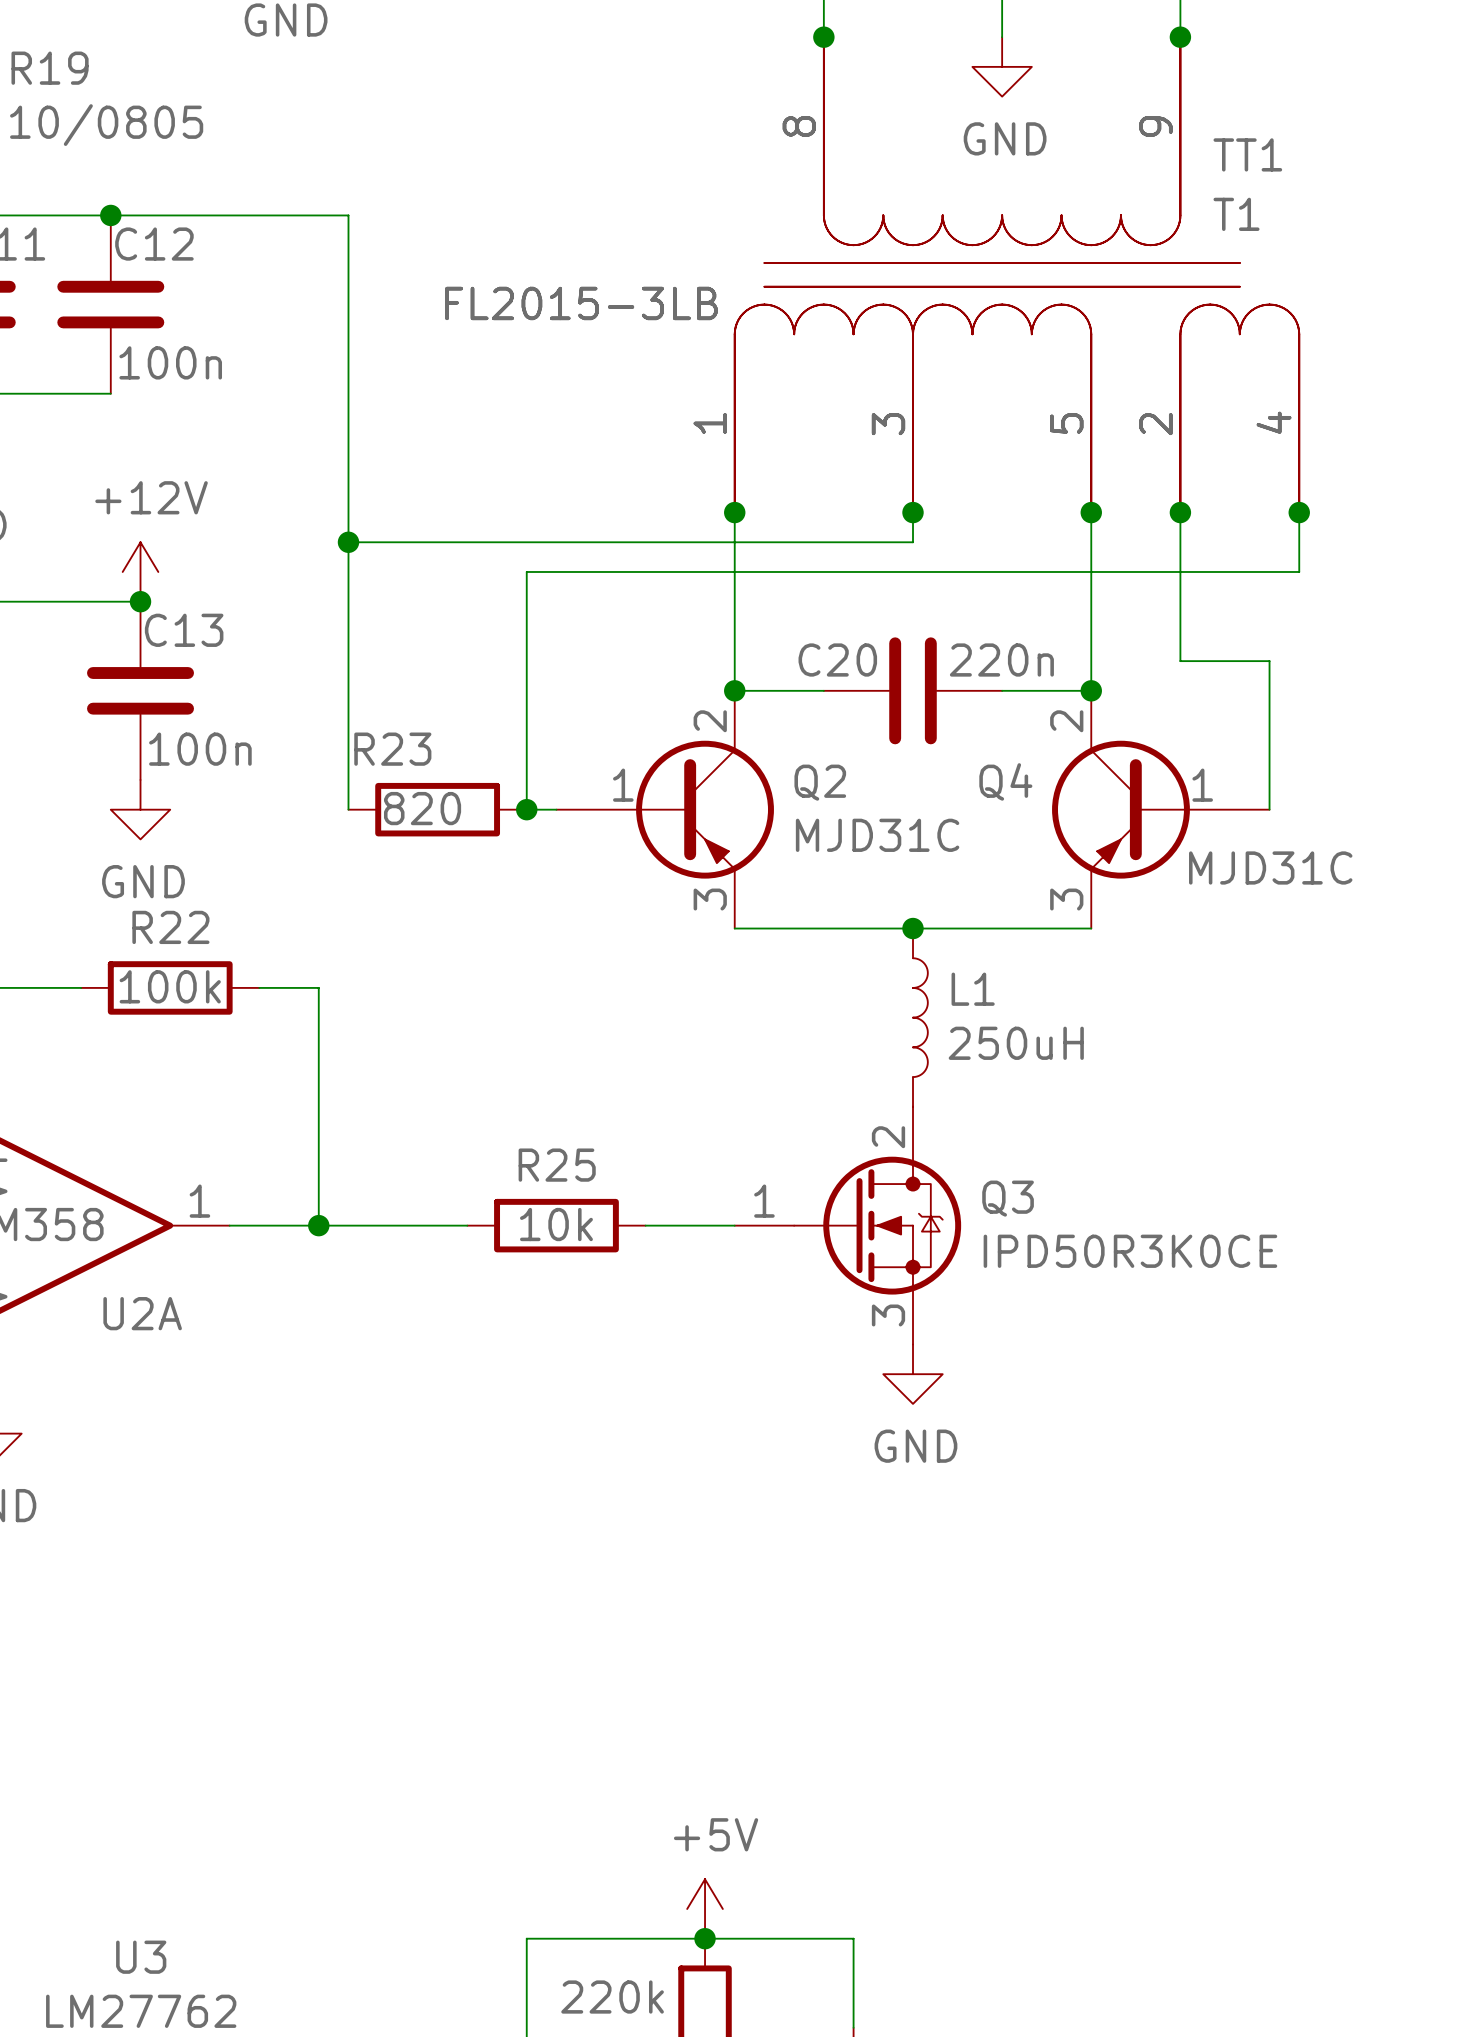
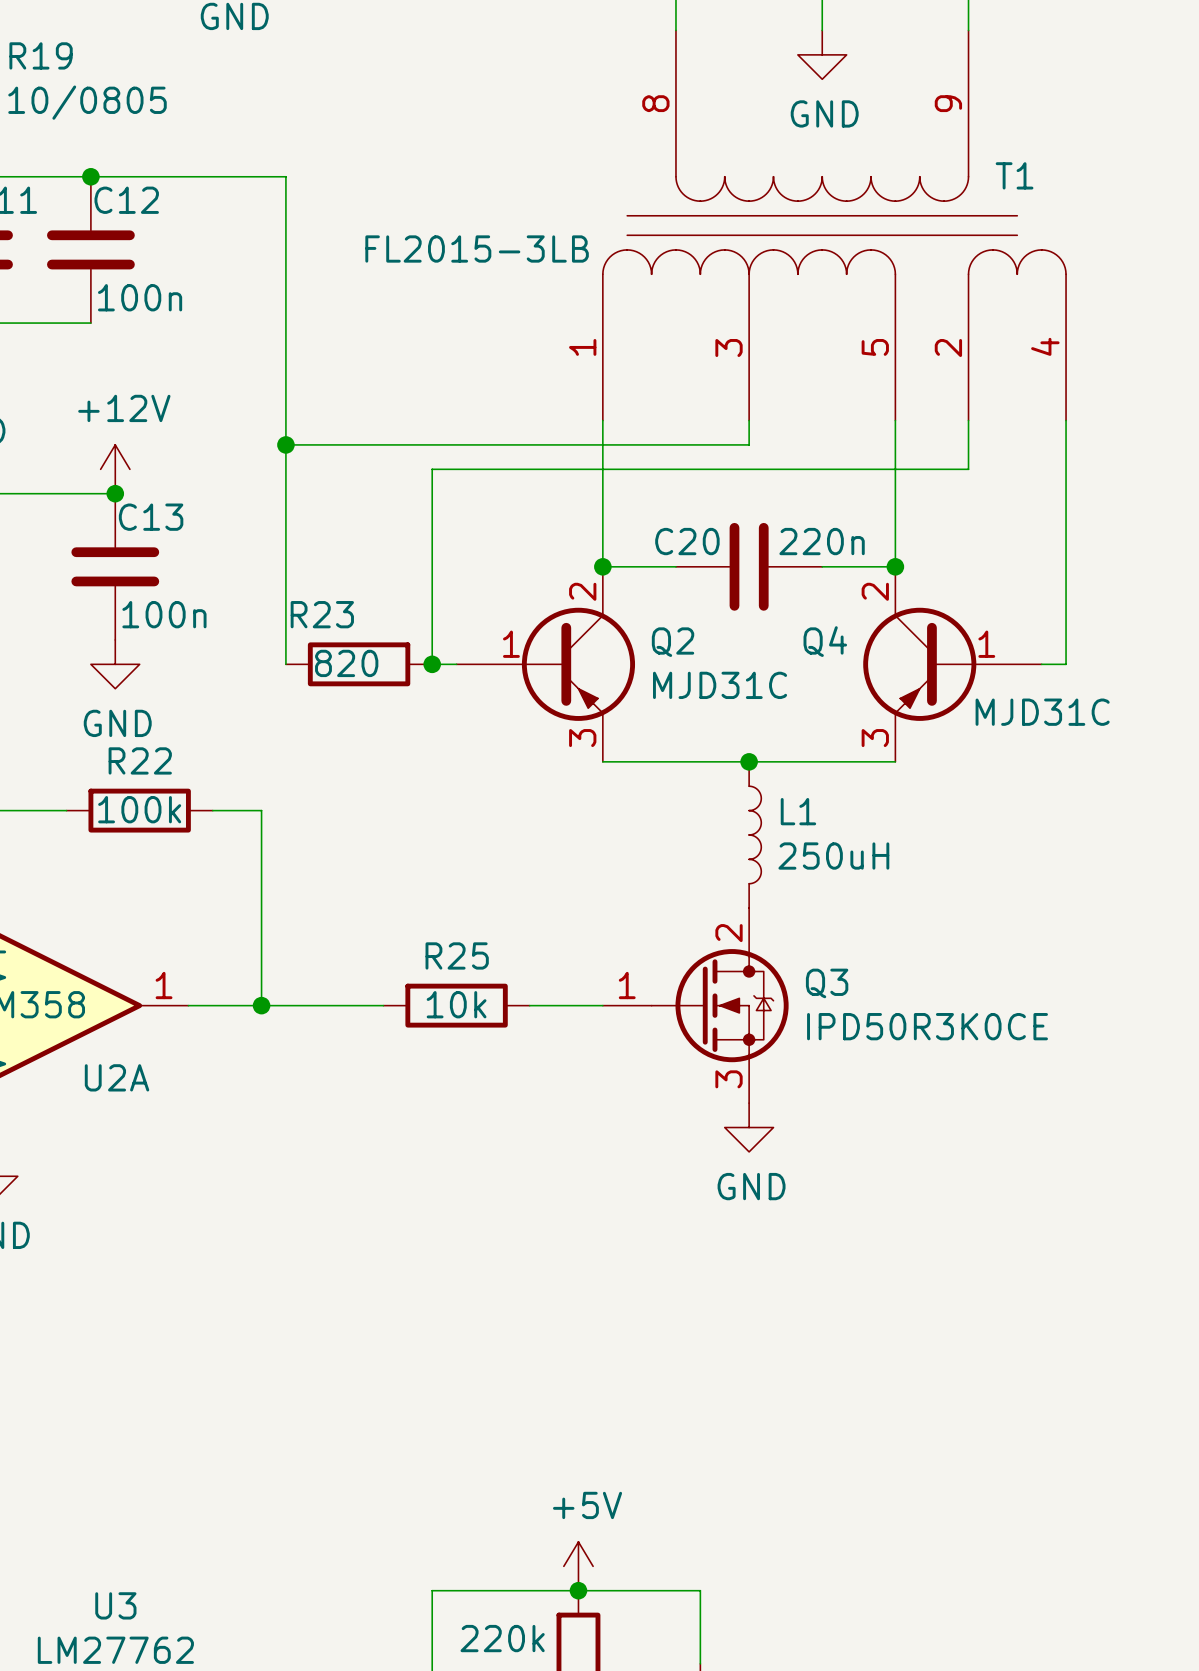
junction: (823, 37) -> none
junction: (1180, 37) -> none
TT1: FL2015-3LB (1016, 274) -> none
junction: (734, 512) -> none
junction: (913, 512) -> none
junction: (1091, 512) -> none
junction: (1180, 512) -> none
junction: (1299, 512) -> none
wire: (1299, 571) (1180, 571) (1180, 661) (1269, 661) (1269, 809) -> (1066, 469) (1066, 664) (1041, 664)

